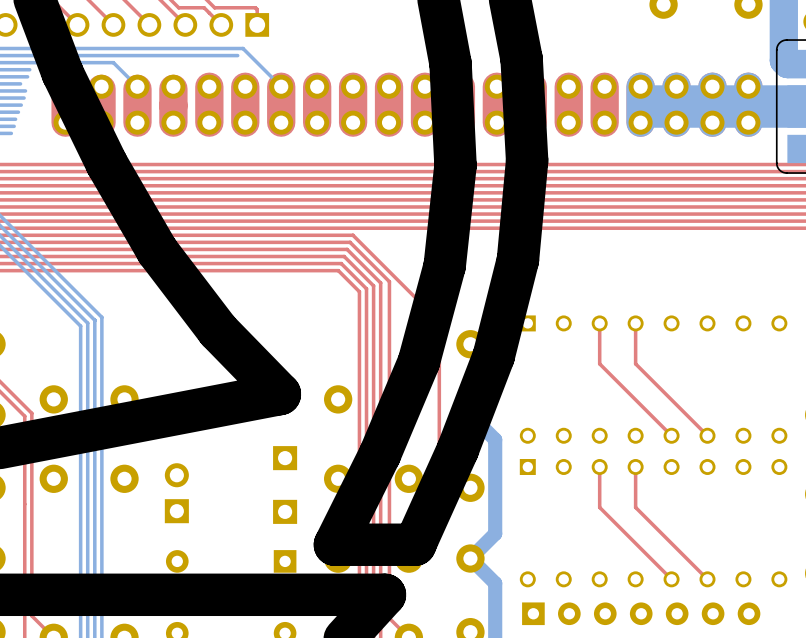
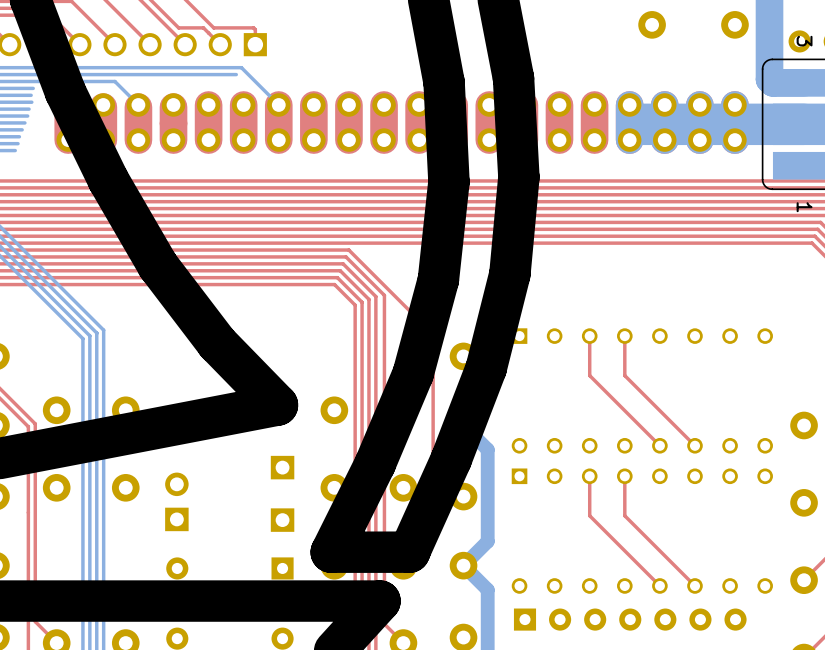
bottom track: none -> (31, 102) (24, 102)

